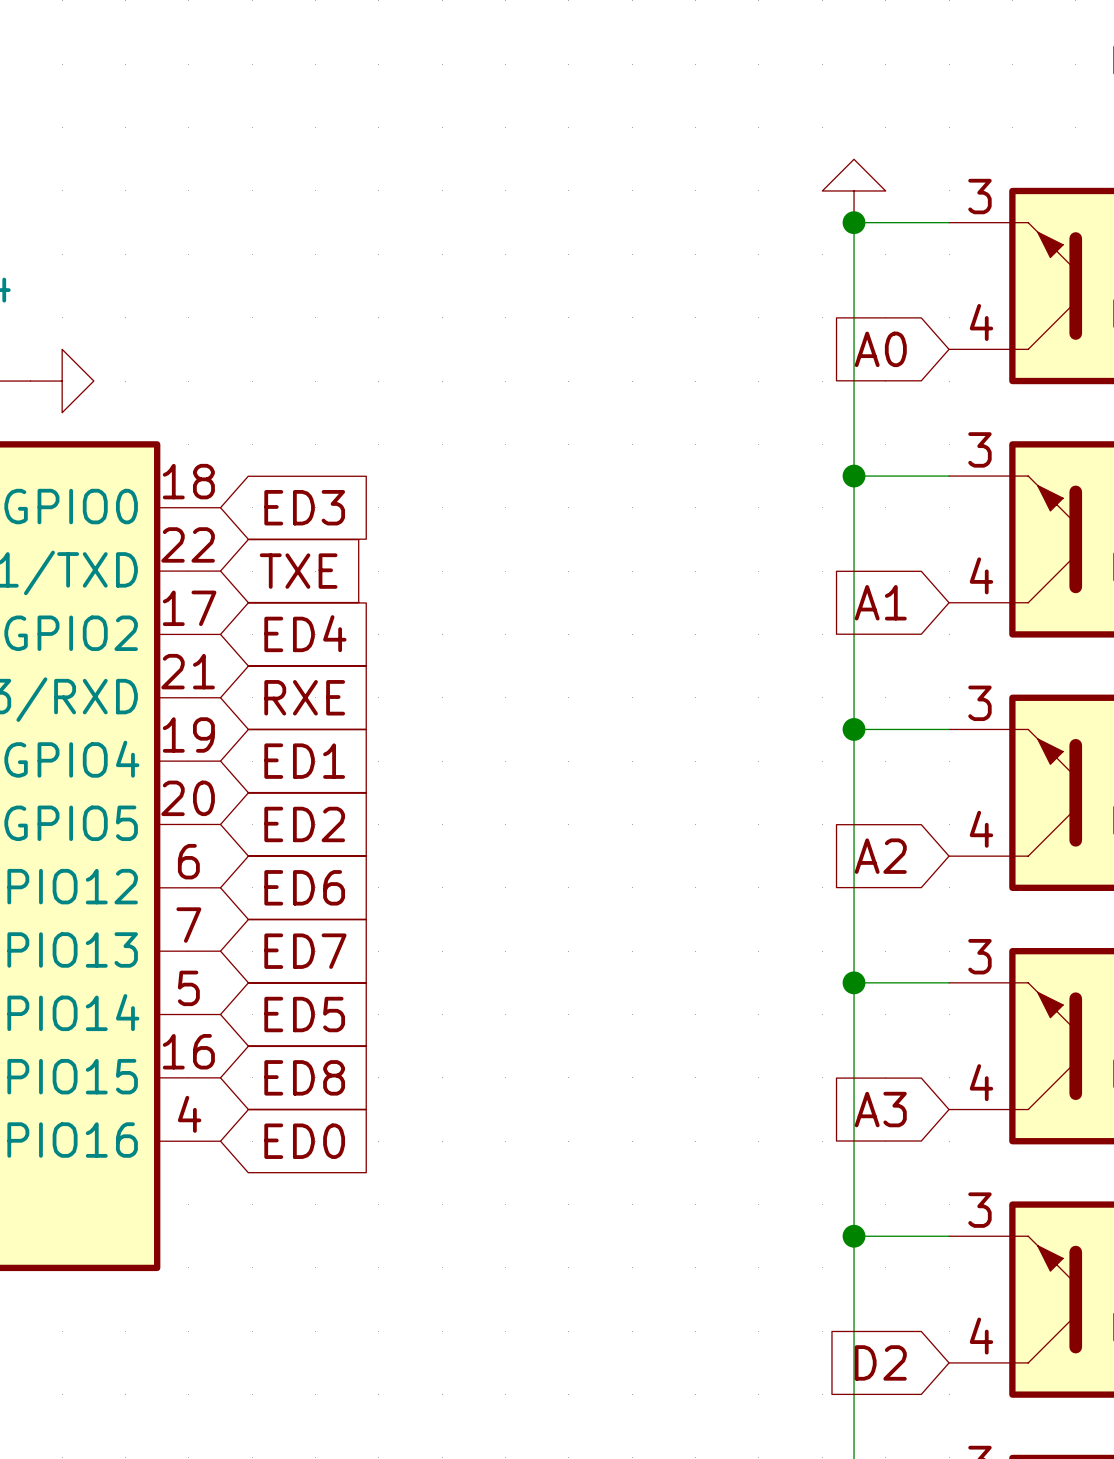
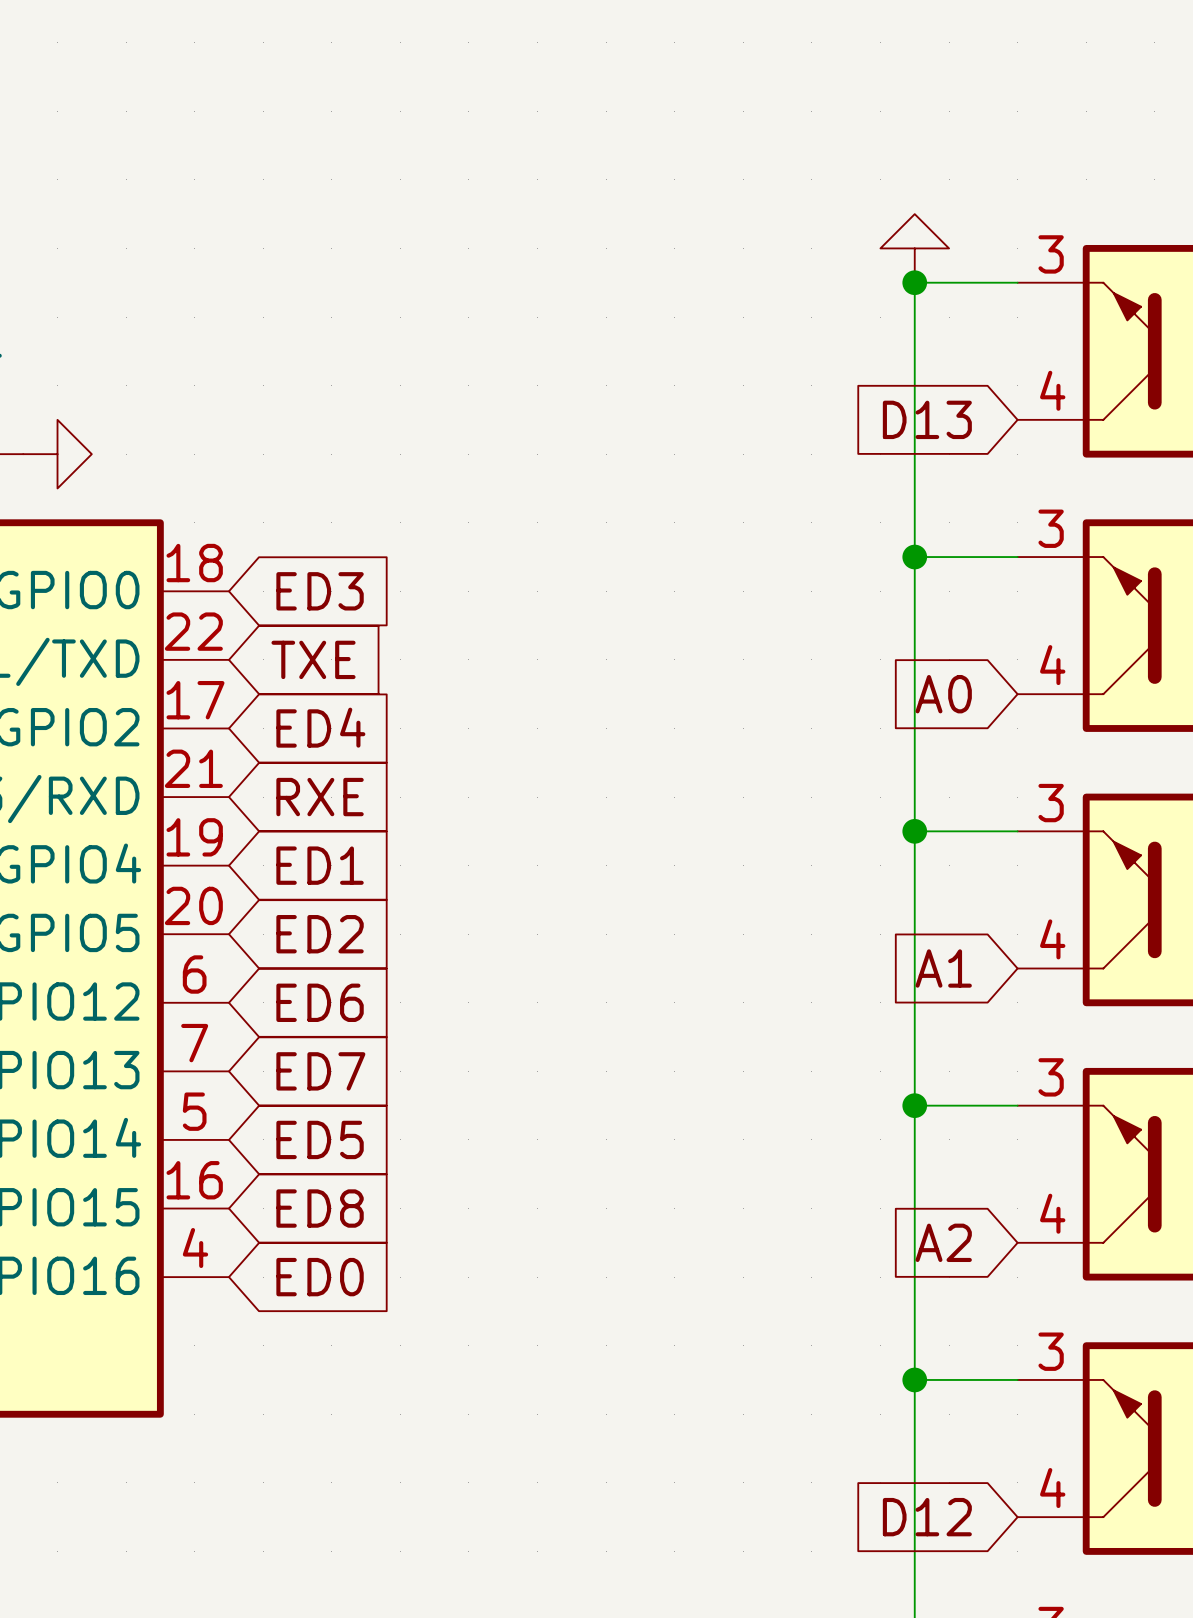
global label: A0 (880, 349) -> D13 (927, 419)
global label: A1 (880, 602) -> A0 (943, 694)
global label: A2 (880, 856) -> A1 (943, 968)
global label: A3 (880, 1109) -> A2 (943, 1242)
global label: D2 (880, 1362) -> D12 (927, 1517)

